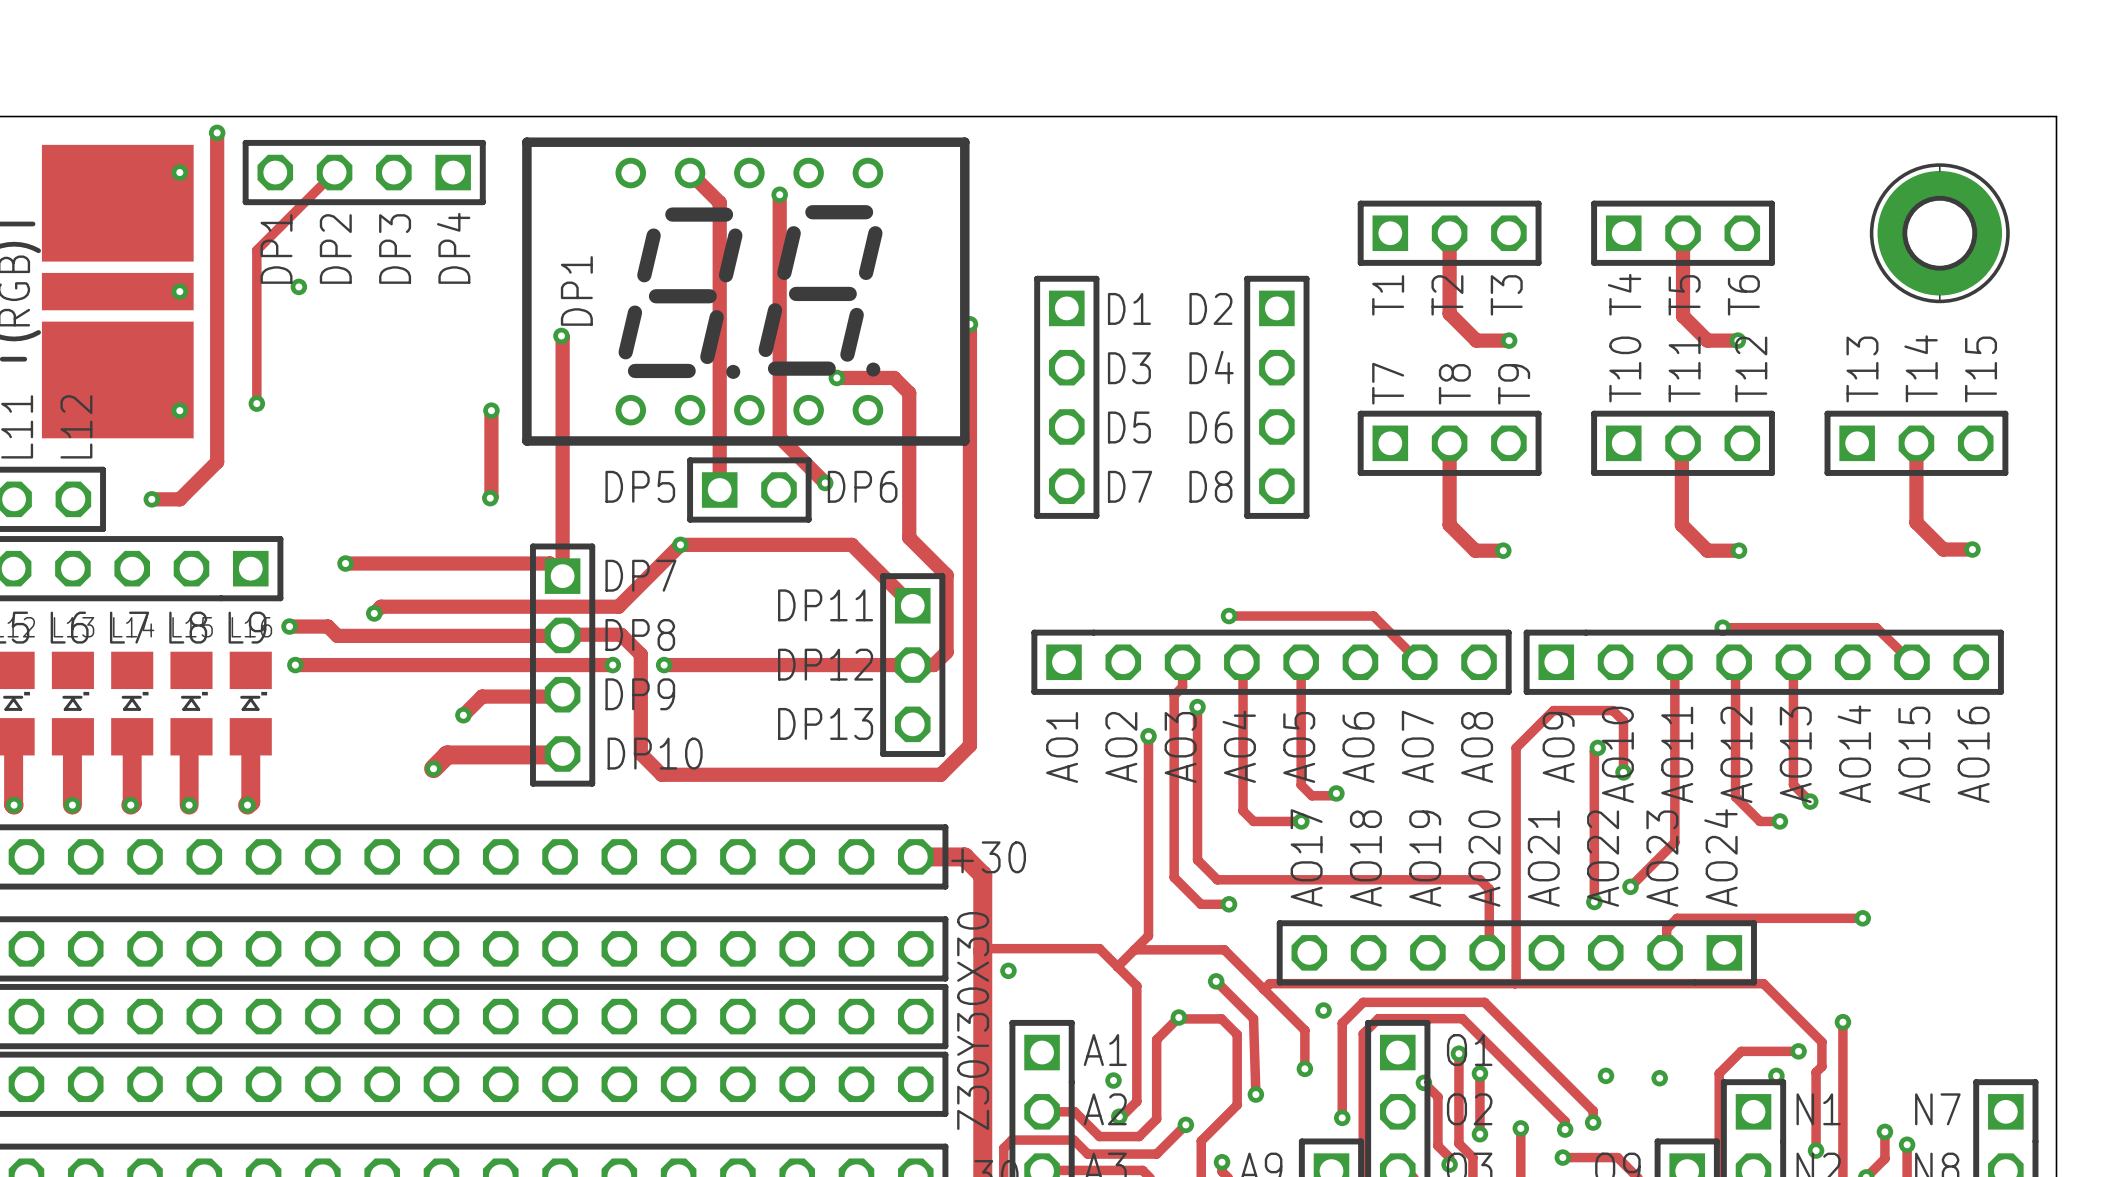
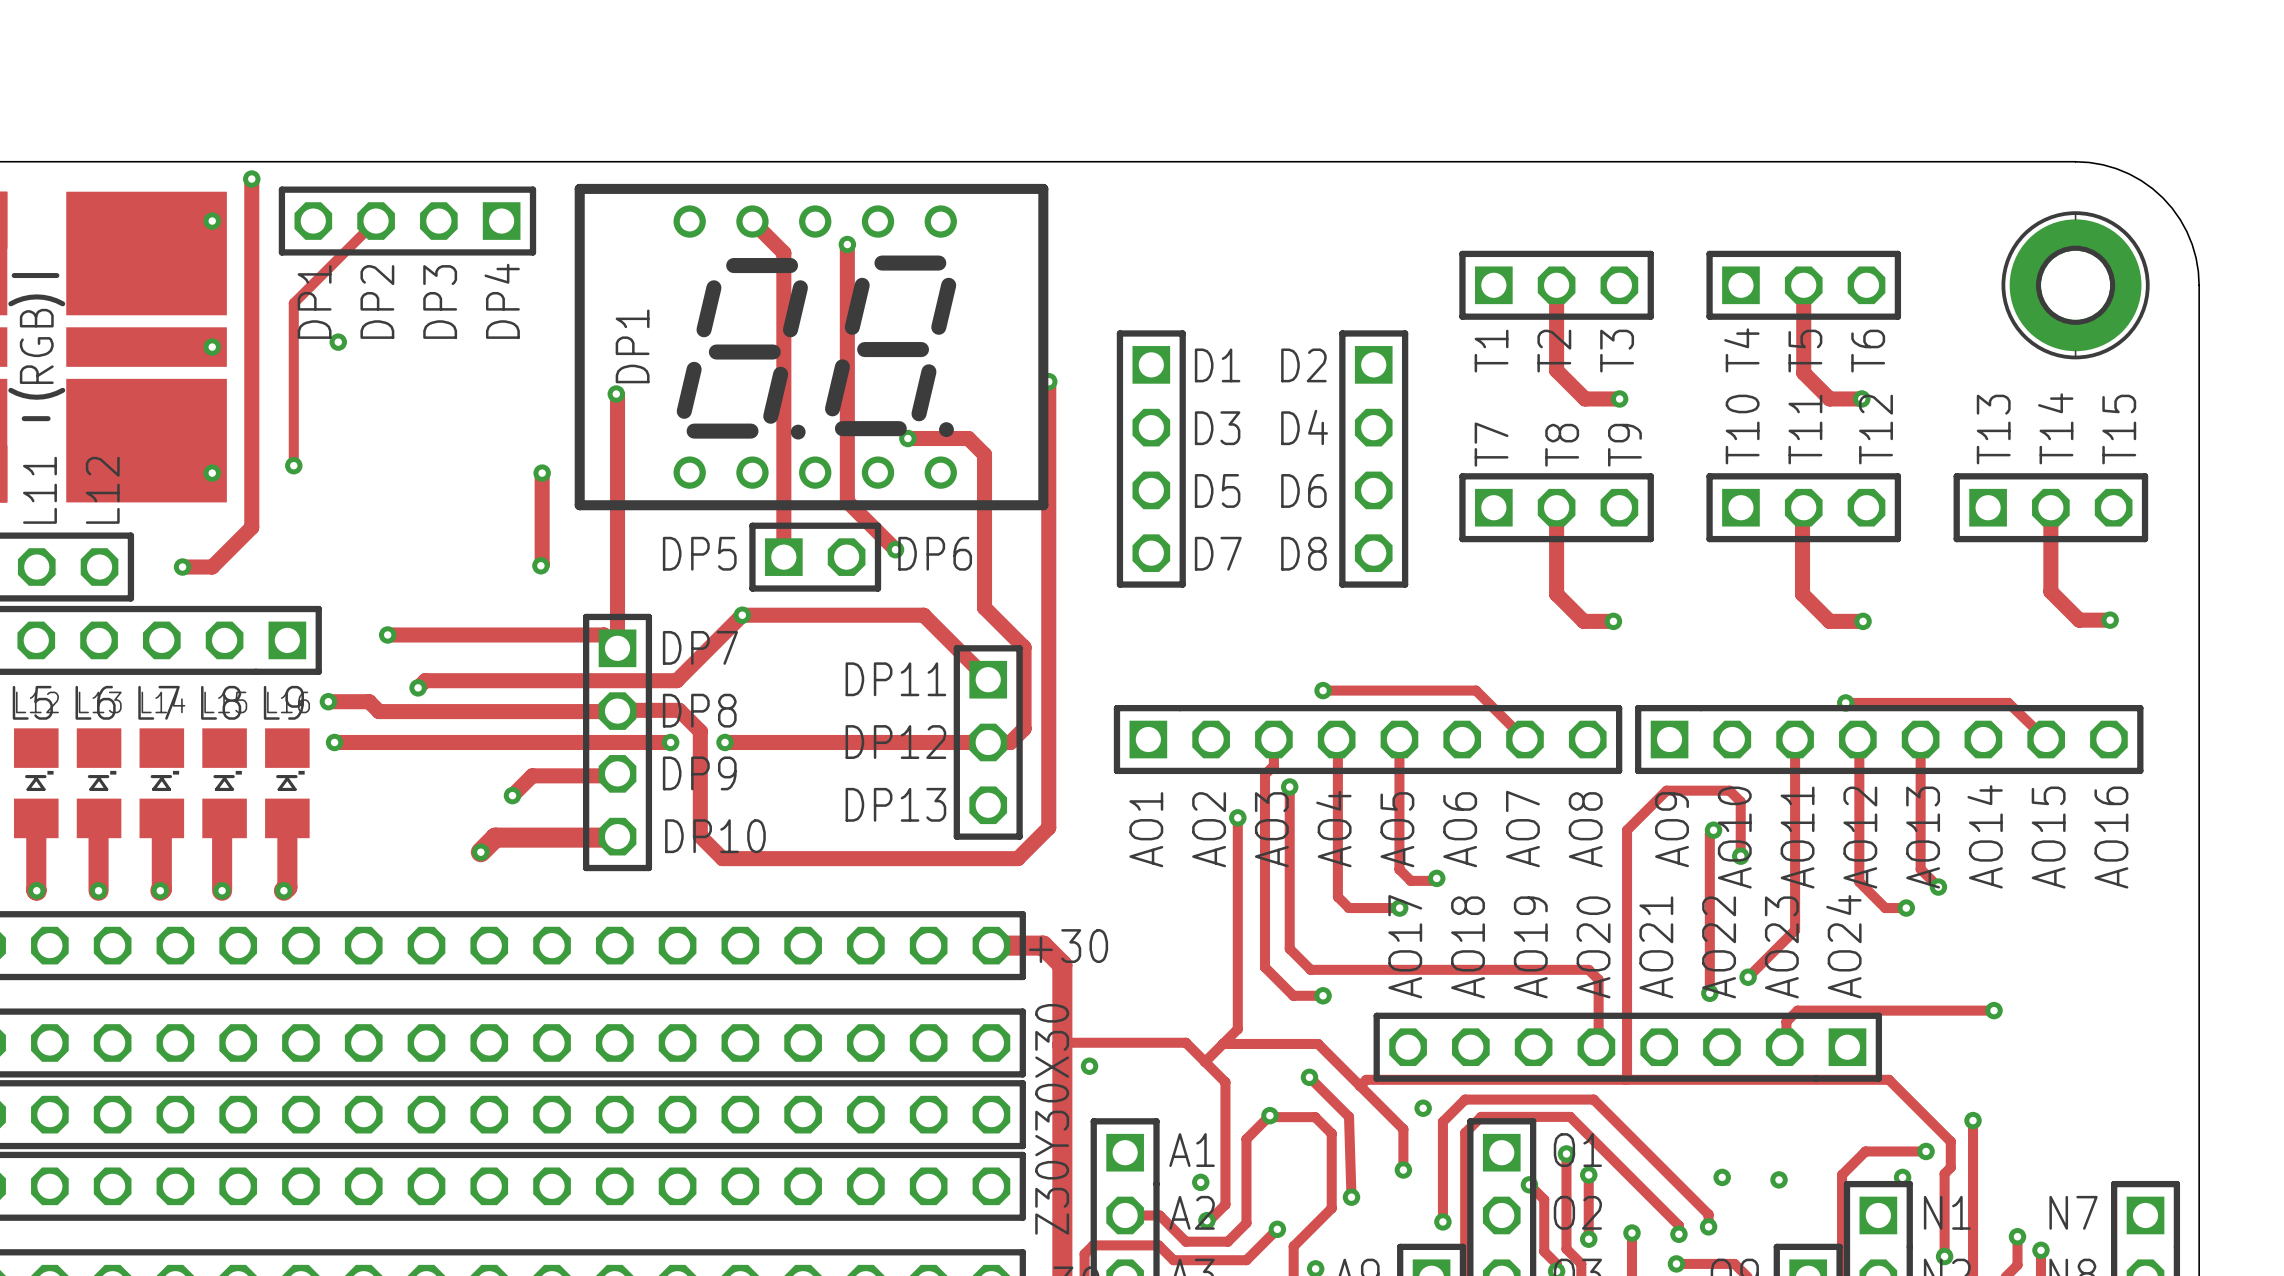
board edge: (1939, 116) (2056, 116) (2056, 233) -> (2075, 161) (2089, 162) (2116, 168) (2141, 180) (2162, 197) (2180, 219) (2192, 244) (2198, 271) (2199, 285)

